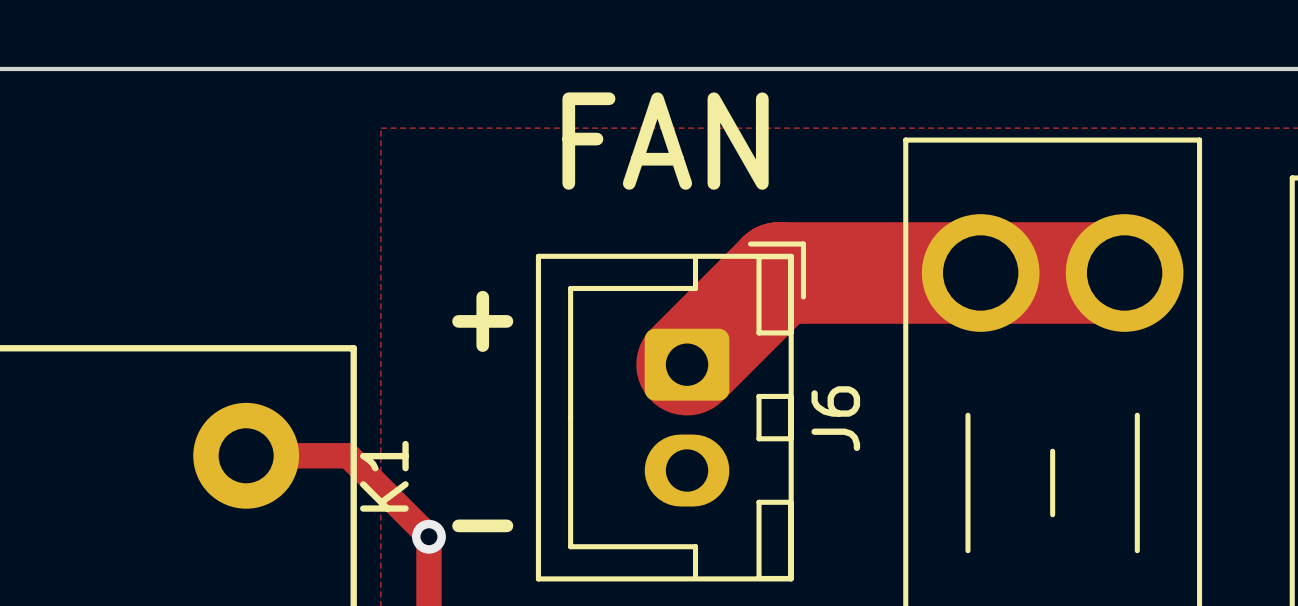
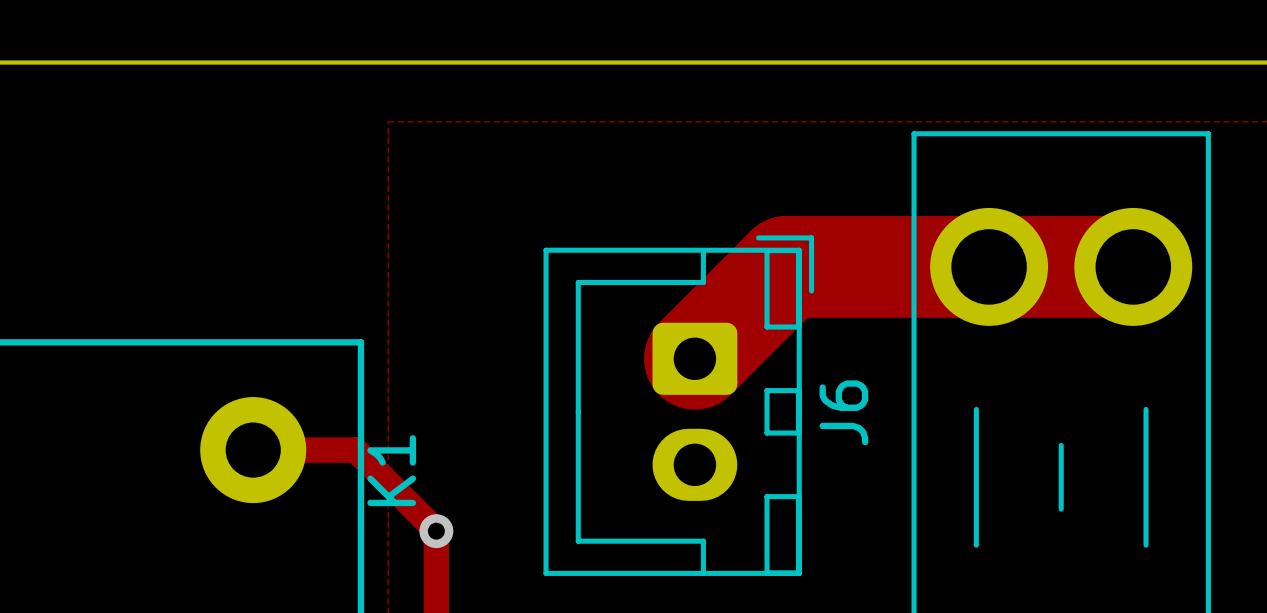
text: FAN (665, 141) -> none
text: + (482, 321) -> none
text: - (482, 525) -> none

